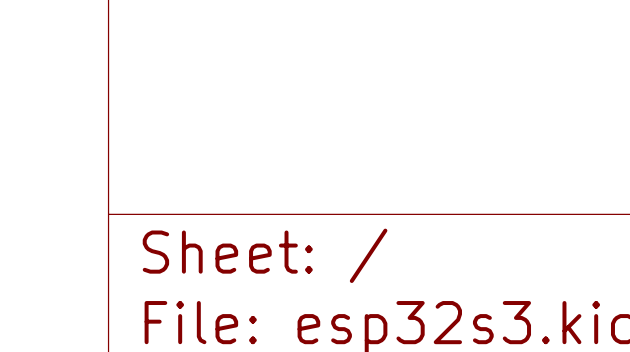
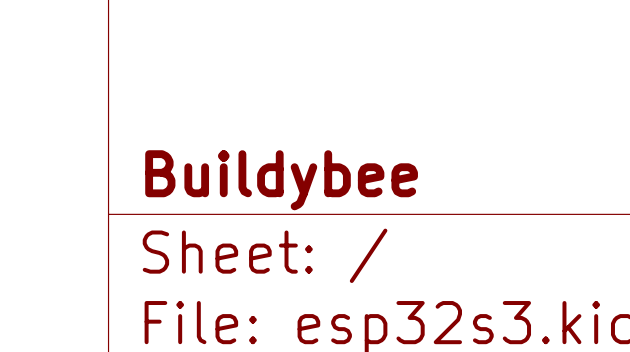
title block: none -> Buildybee (281, 180)

